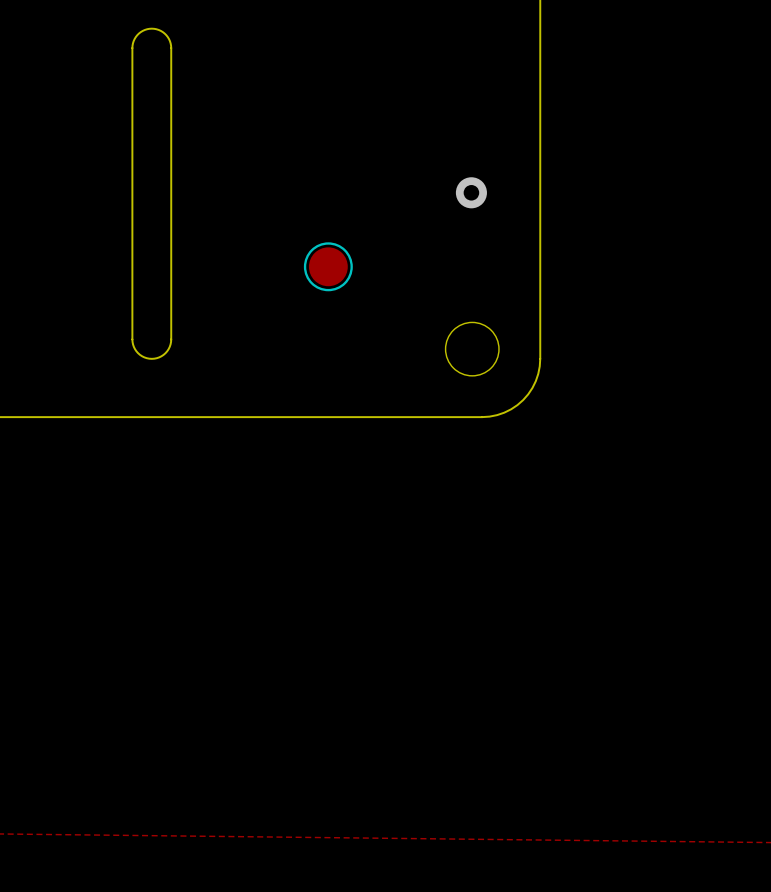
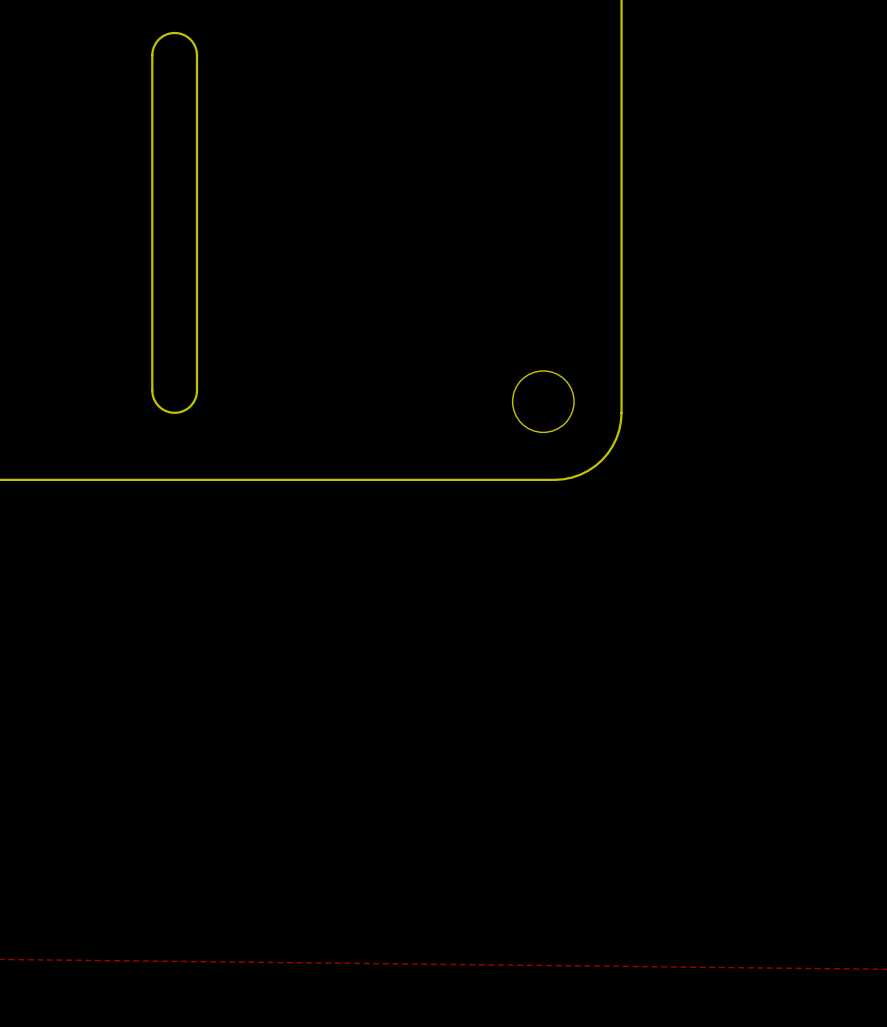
via: (471, 192) -> none
part: (328, 266) -> none

